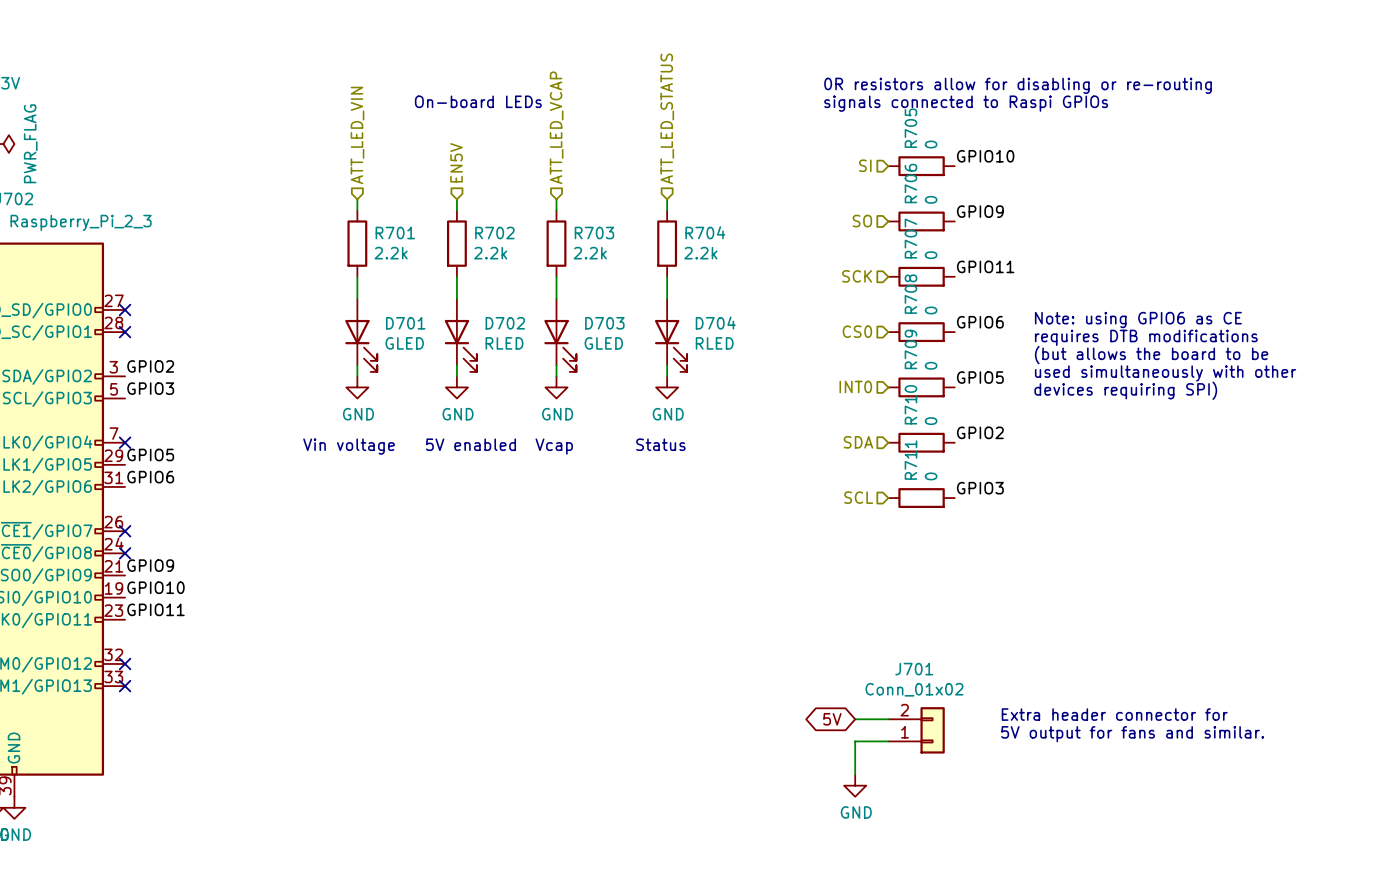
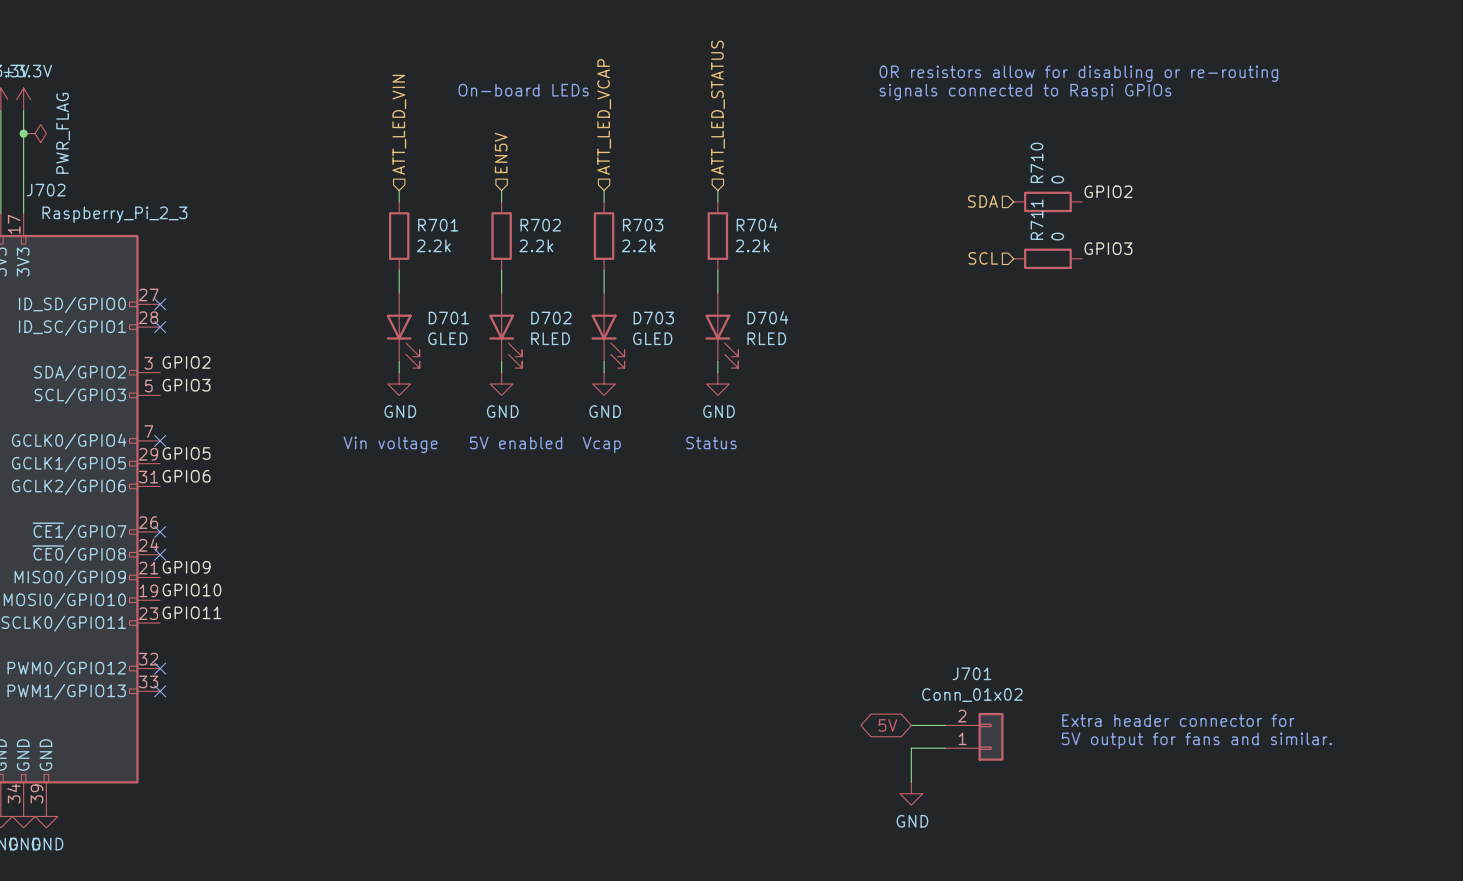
label: GPIO10 (985, 156) -> none
hierarchical label: SI (865, 165) -> none
R705: 0 (921, 166) -> none
label: none -> GPIO2 (1108, 191)
hierarchical label: none -> SDA (982, 201)
label: GPIO9 (980, 211) -> none
hierarchical label: SO (862, 221) -> none
R706: 0 (921, 221) -> none
hierarchical label: none -> SCL (983, 258)
label: GPIO11 (985, 266) -> GPIO3 (1108, 248)
hierarchical label: SCK (857, 276) -> none
R707: 0 (921, 276) -> none
text: Note: using GPIO6 as CE (1138, 320) -> none
label: GPIO6 (980, 322) -> none
hierarchical label: CS0 (857, 331) -> none
R708: 0 (921, 332) -> none
text: requires DTB modifications (1146, 337) -> none
text: (but allows the board to be (1151, 355) -> none
text: used simultaneously with other (1165, 373) -> none
label: GPIO5 (980, 377) -> none
hierarchical label: INT0 (855, 387) -> none
R709: 0 (921, 387) -> none
text: devices requiring SPI) (1125, 390) -> none
label: GPIO2 (980, 432) -> none
hierarchical label: SDA (858, 442) -> none
R710 position: (921, 442) -> (1047, 201)
label: GPIO3 (980, 488) -> none
hierarchical label: SCL (858, 497) -> none
R711 position: (921, 498) -> (1047, 258)

